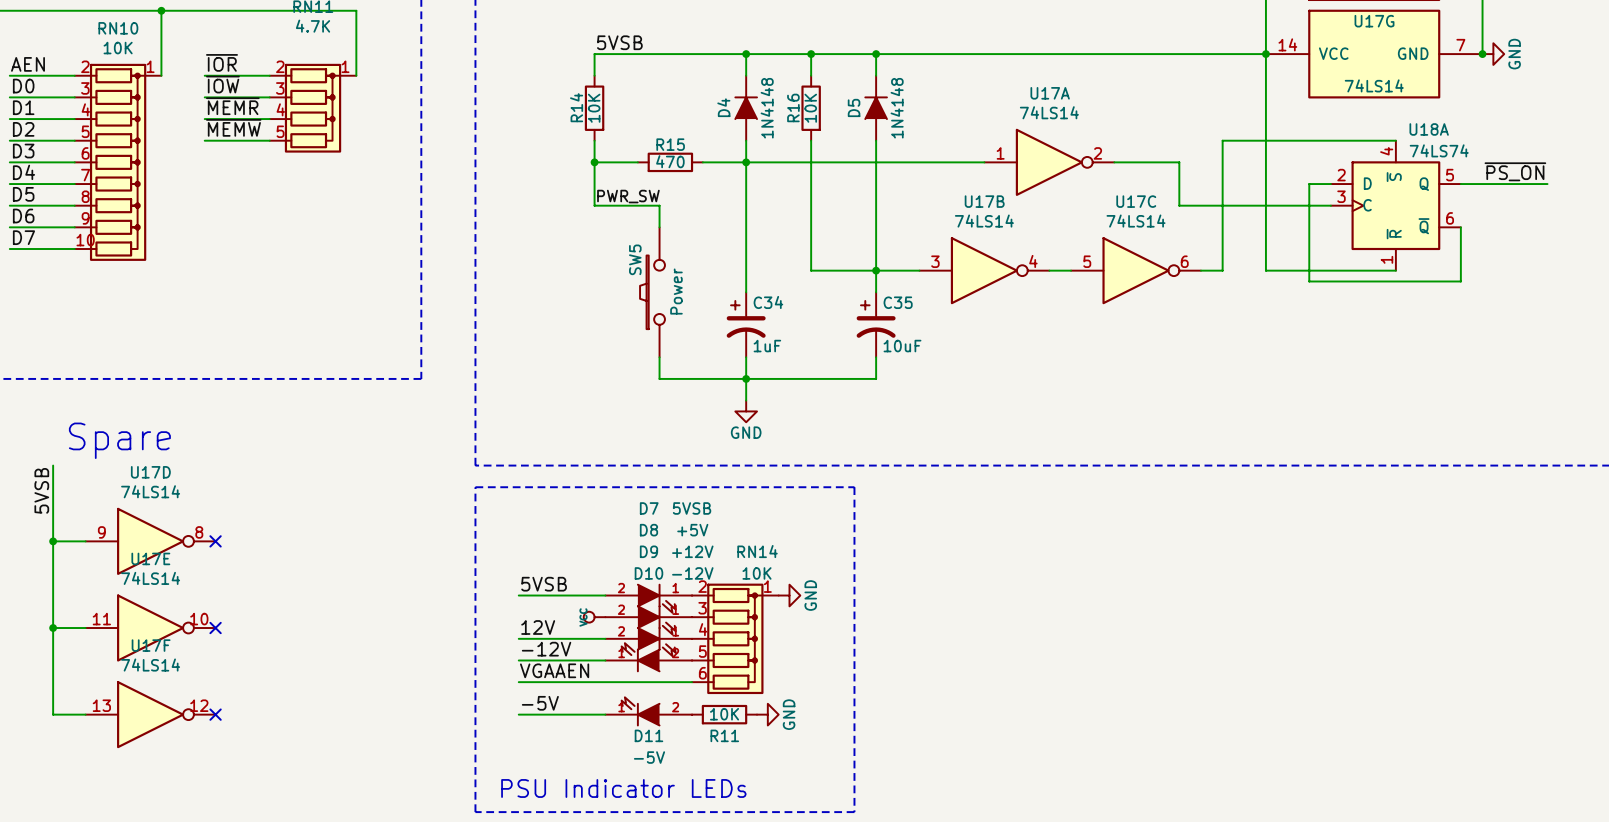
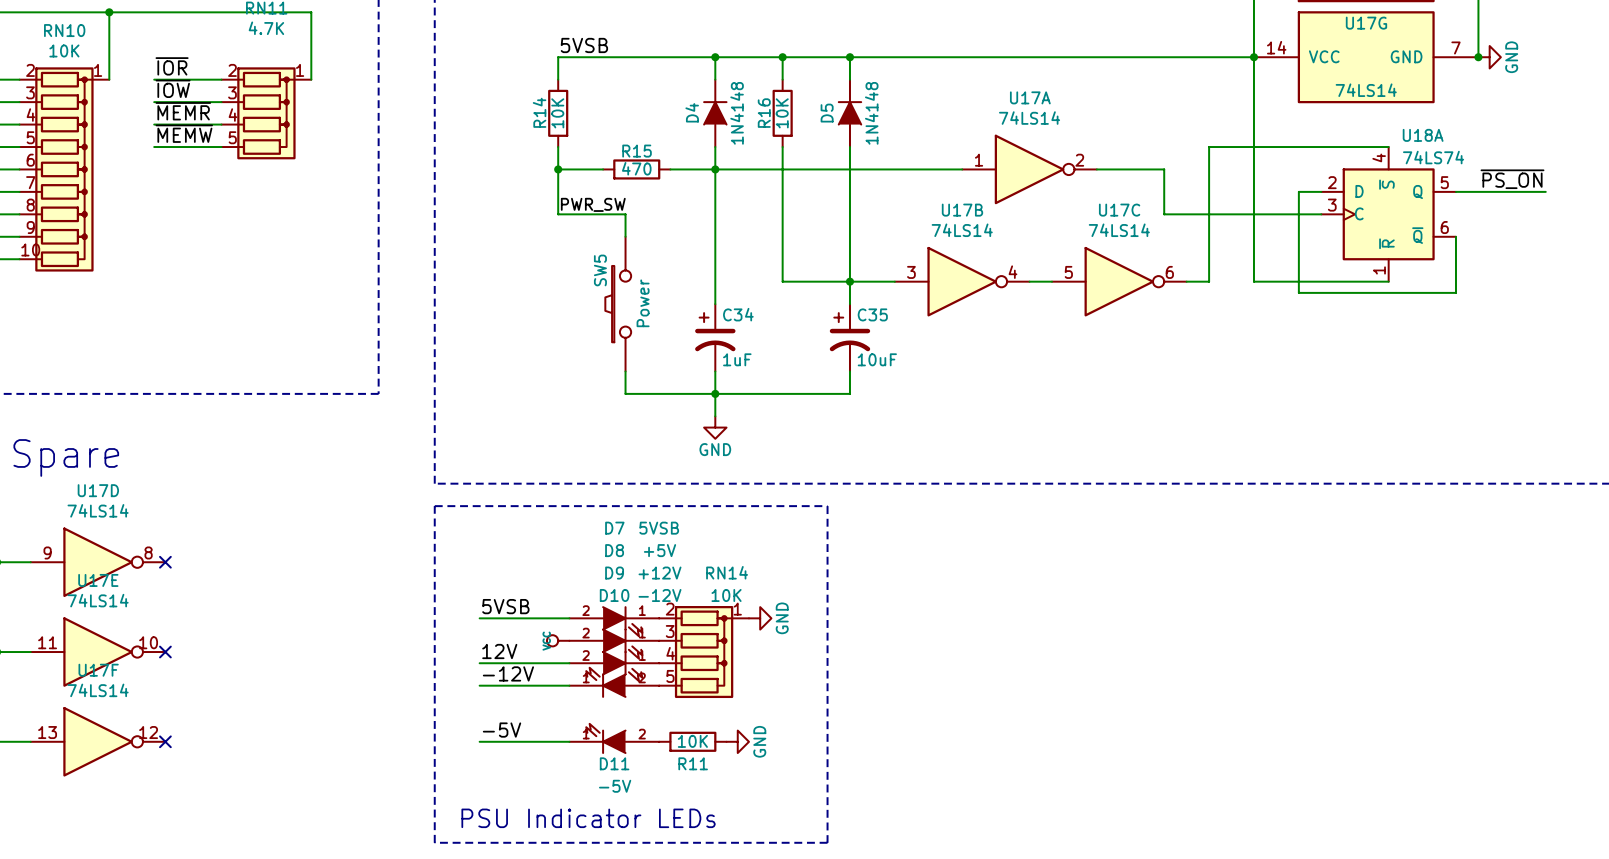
RN14 symbol: [692, 583, 779, 695] -> [659, 606, 749, 699]
label: VGAAEN (554, 670) -> none
wire: (518, 682) (692, 682) -> none

